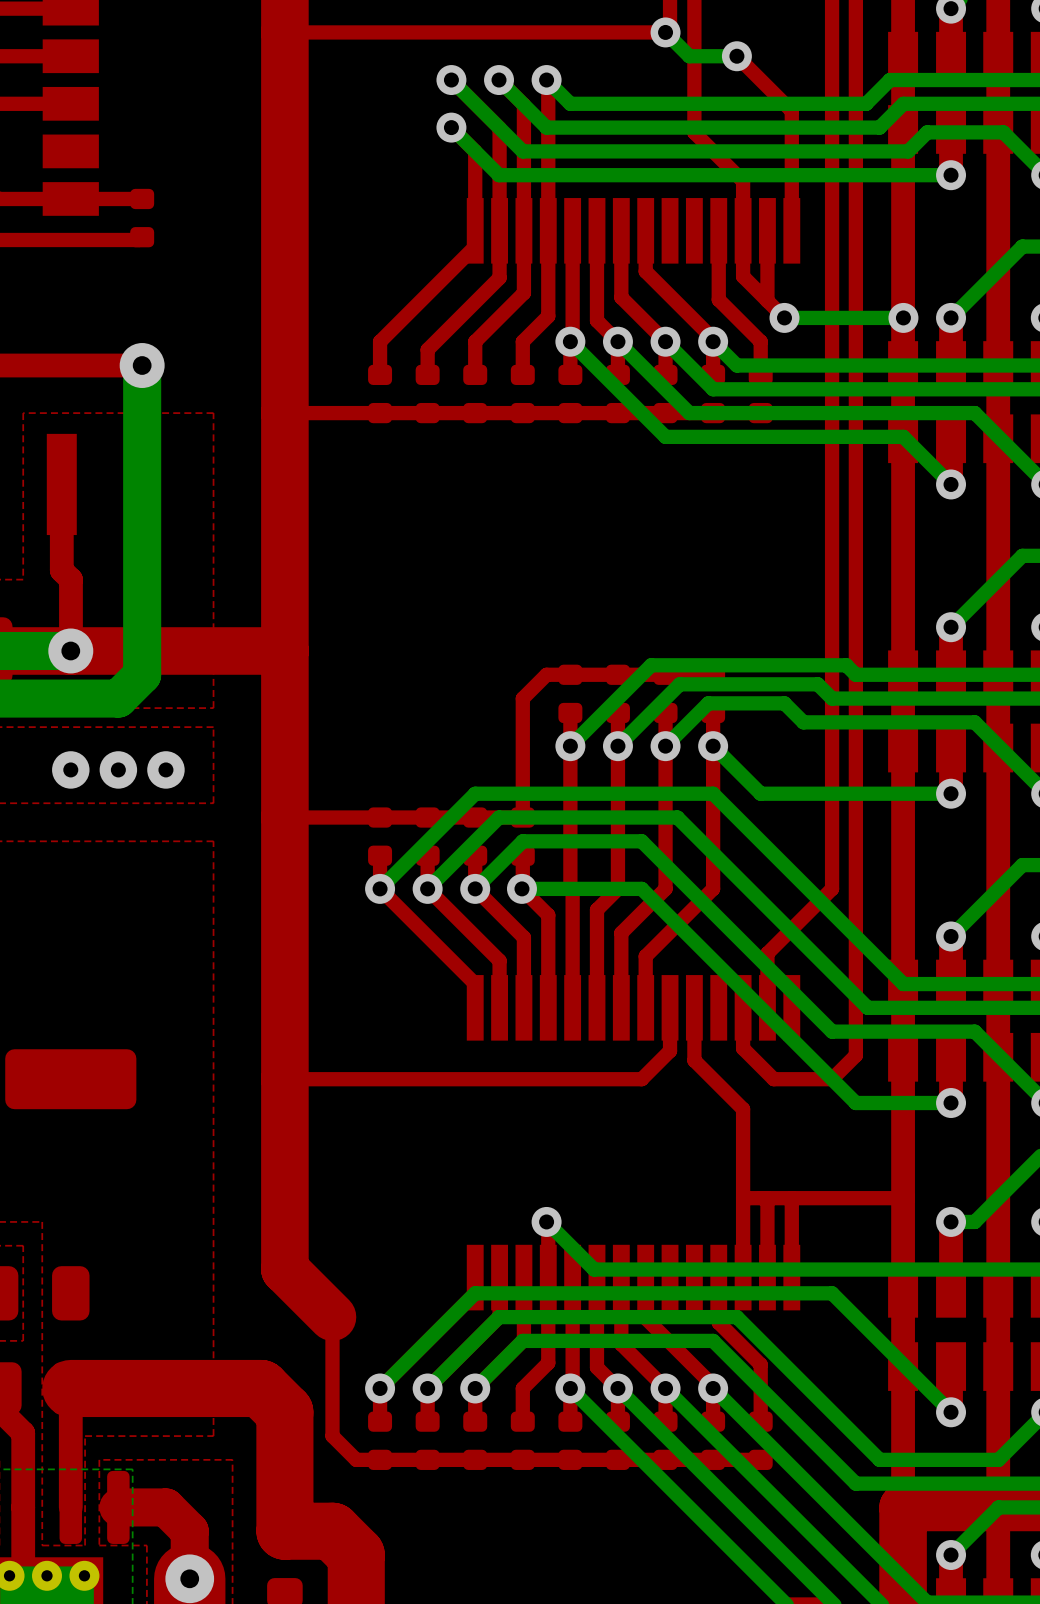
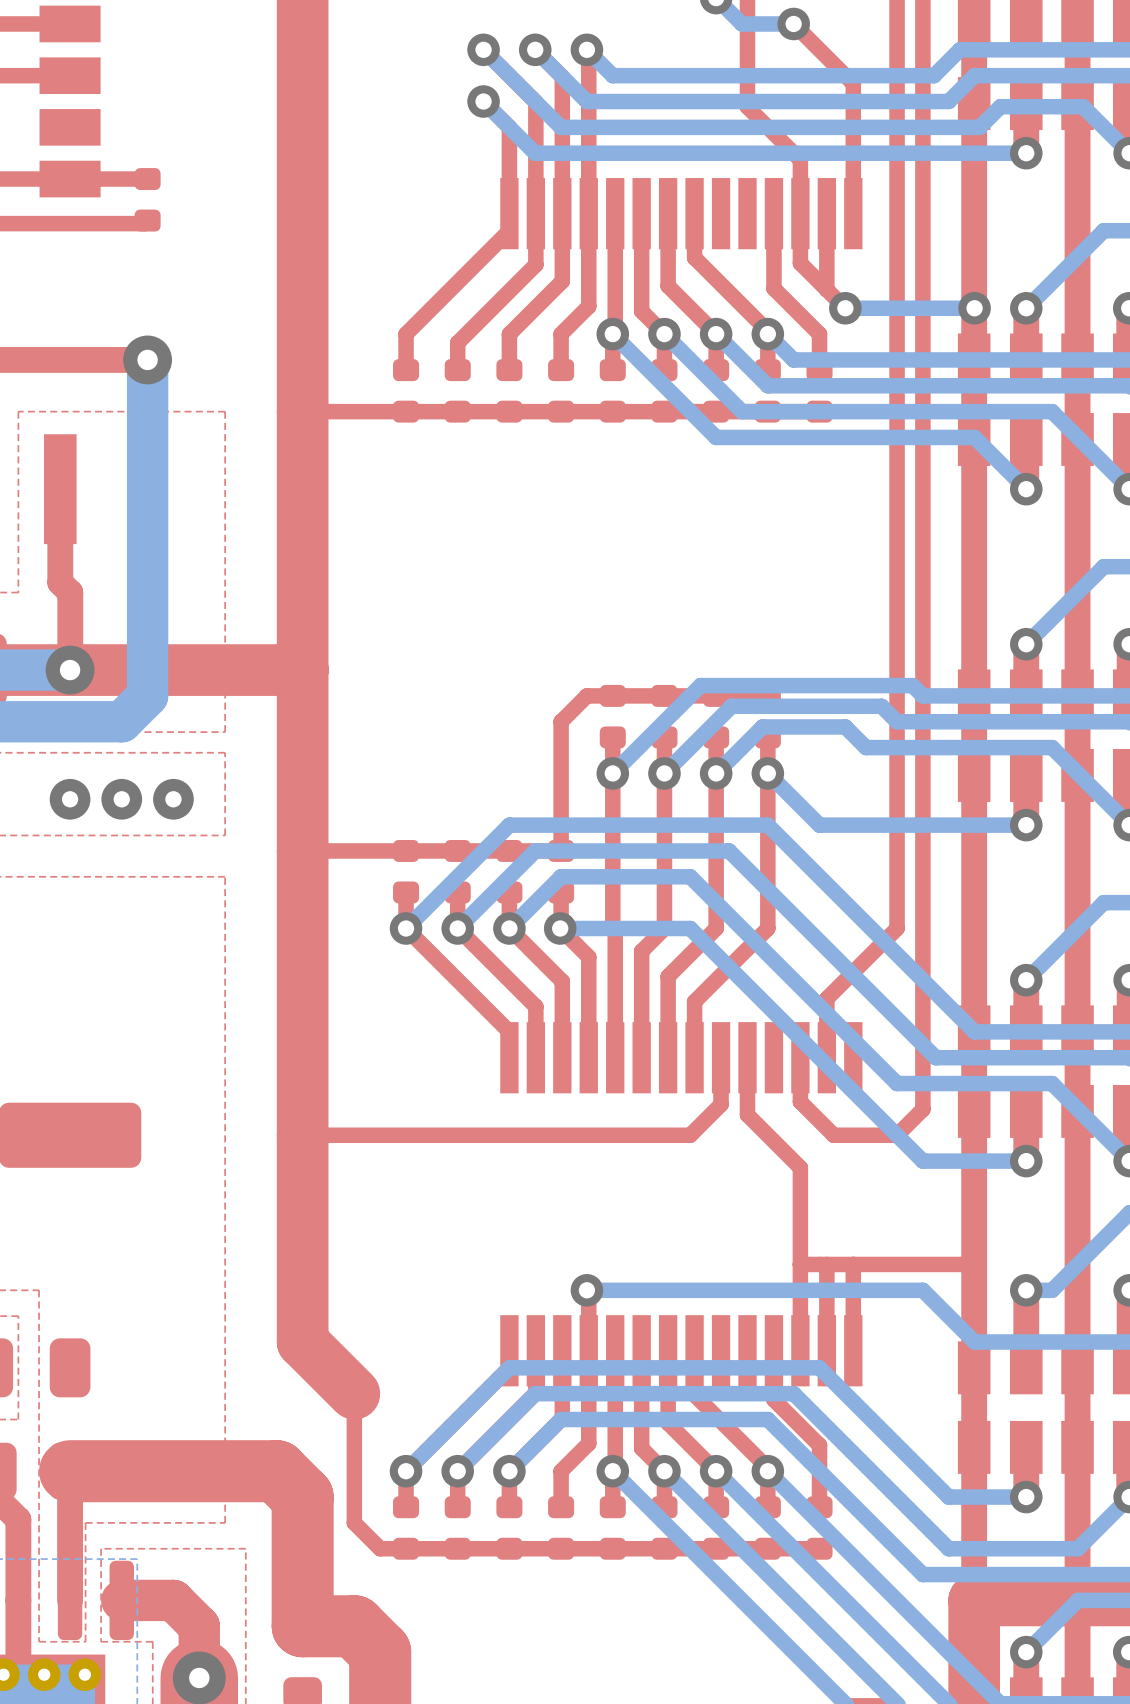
bottom track: (546, 1221) (594, 1269) (903, 1269) -> (586, 1290) (922, 1290) (974, 1341)
bottom track: (760, 1293) (832, 1293) (951, 1412) -> (819, 1367) (948, 1497) (1026, 1497)

